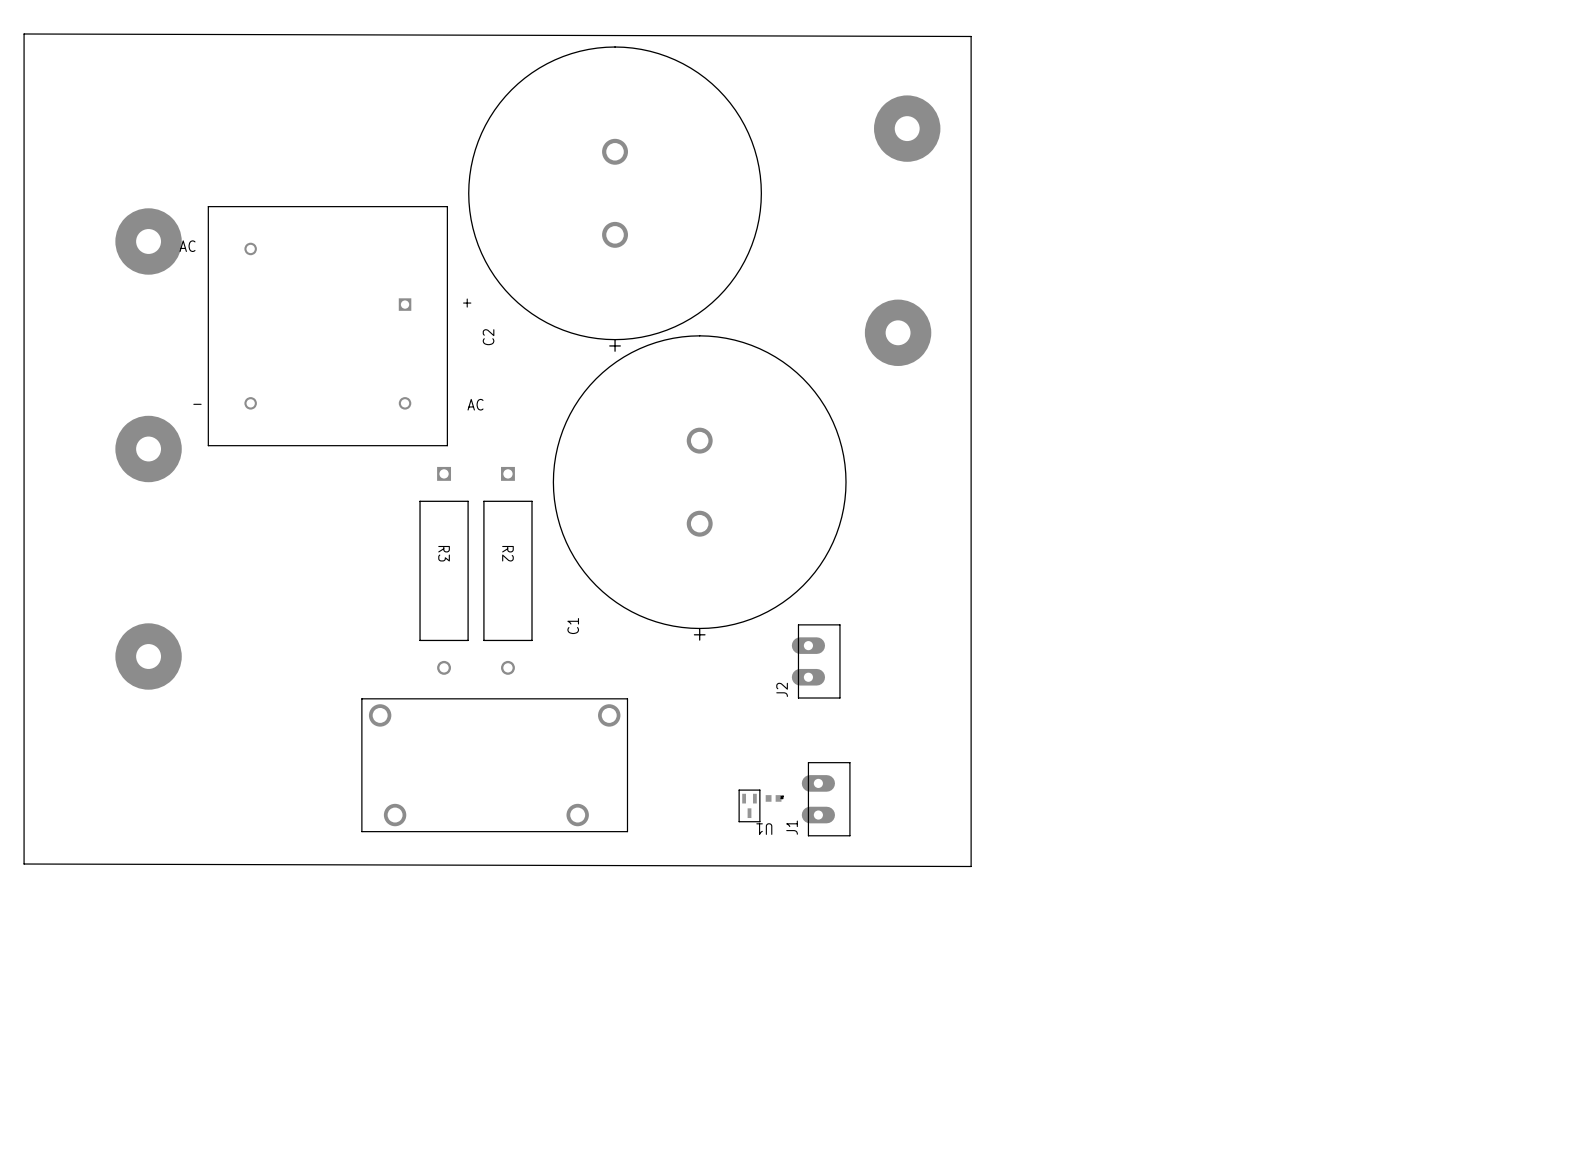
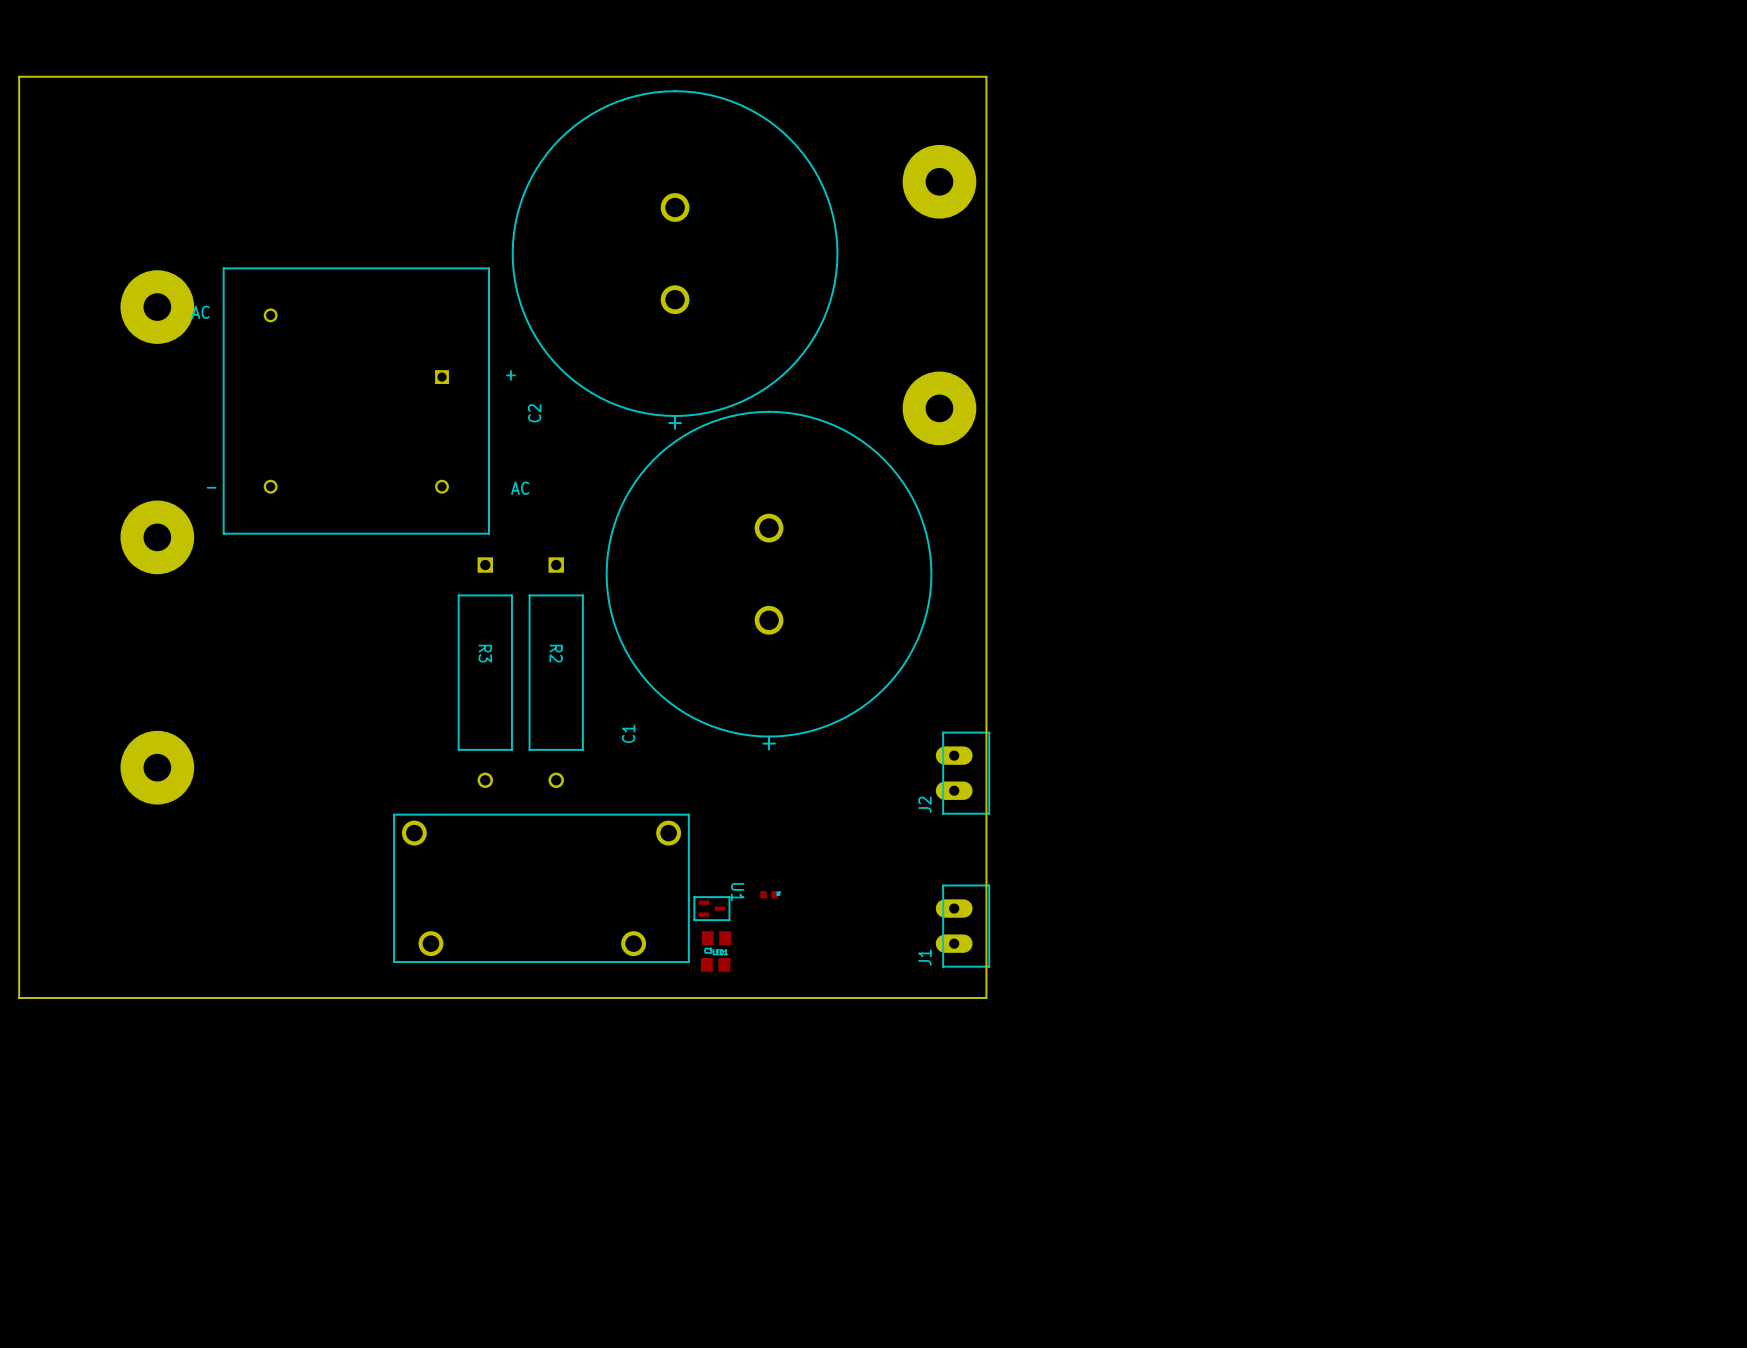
board edge: (24, 33) (971, 36) (971, 866) (24, 864) -> (19, 76) (986, 76) (986, 997) (19, 997)
part position: (907, 128) -> (939, 181)
part position: (898, 332) -> (939, 408)
J2 position: (816, 661) -> (962, 773)
part position: (773, 798) -> (769, 894)
J1 position: (826, 799) -> (962, 926)
U1 rotation: 0° (749, 805) -> 90° counterclockwise (711, 908)
U1 position: (749, 805) -> (711, 908)
part: none -> (716, 938)
part: none -> (715, 964)

